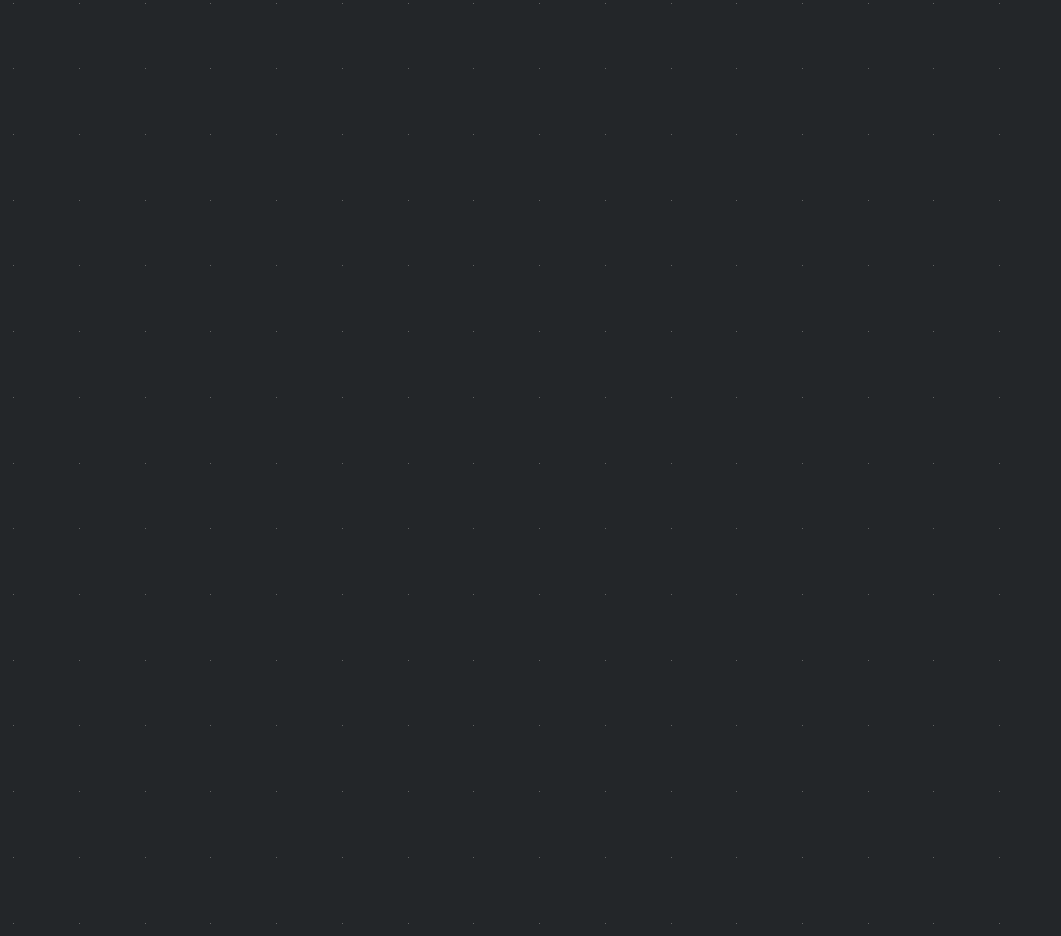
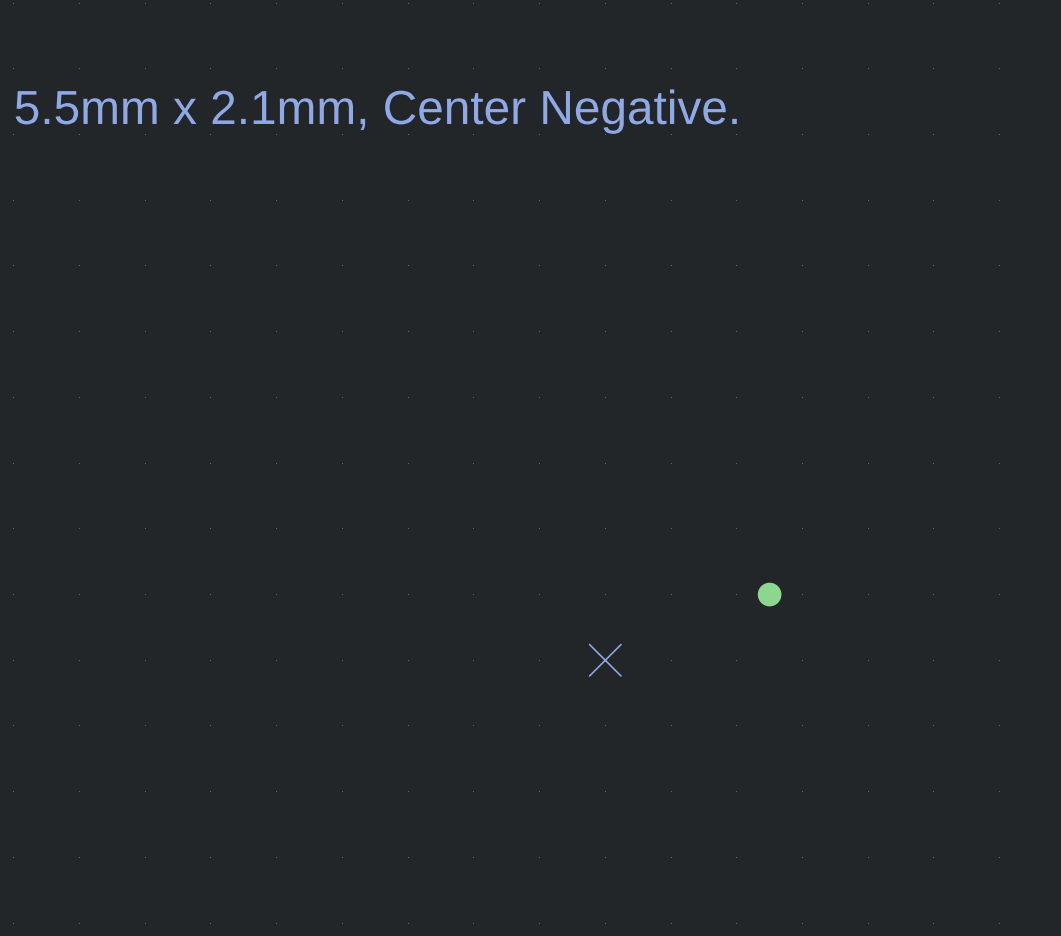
text: none -> 5.5mm x 2.1mm, Center Negative. (376, 111)
junction: none -> (769, 594)
no-connect mark: none -> (605, 660)

